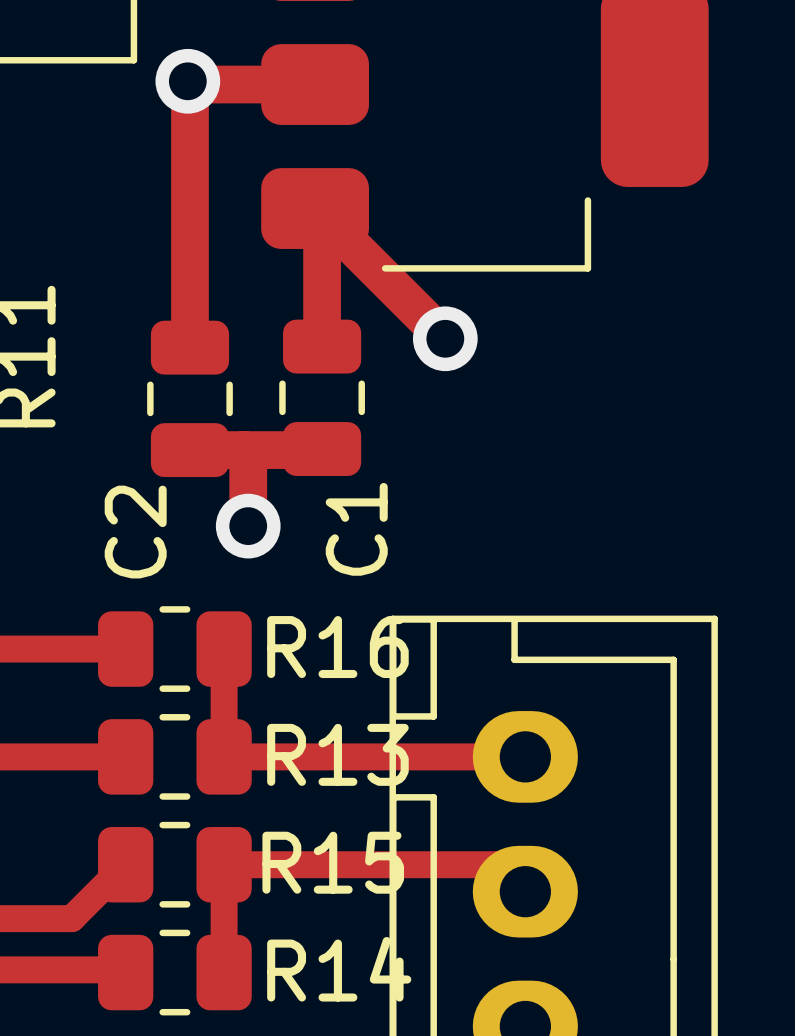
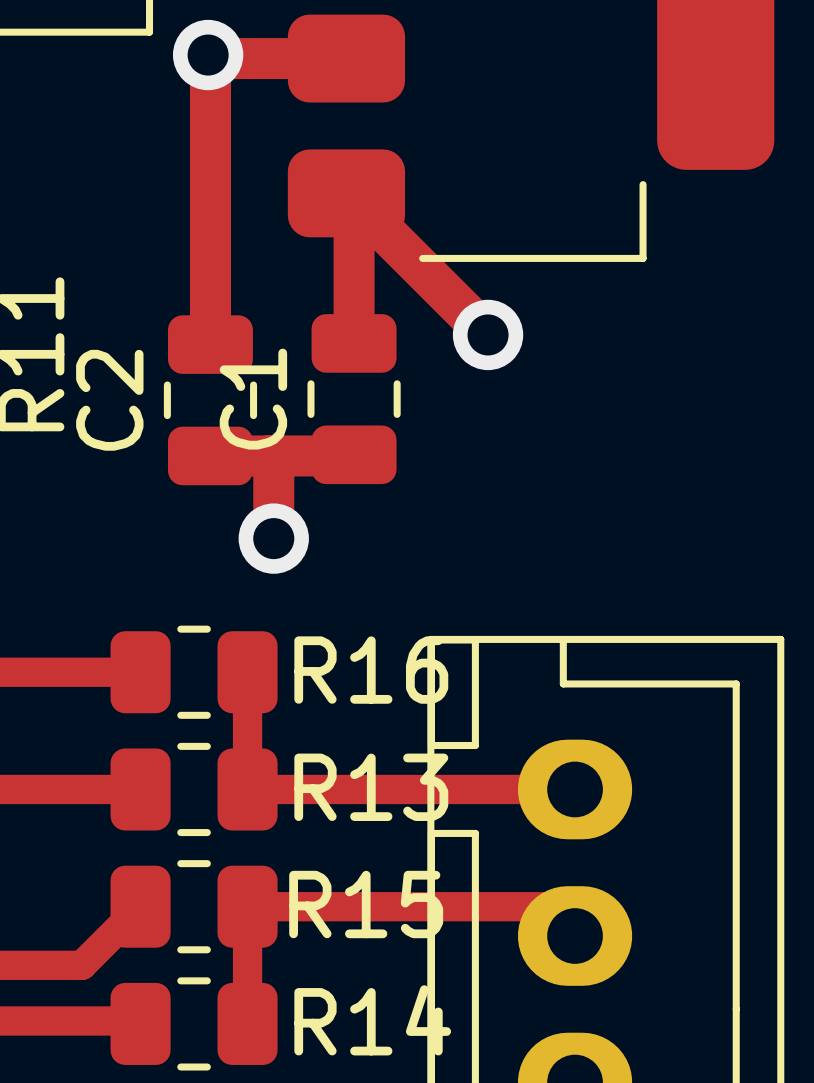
C1 name position: C1 (356, 529) -> C1 (253, 399)
C2 name position: C2 (135, 532) -> C2 (109, 400)

